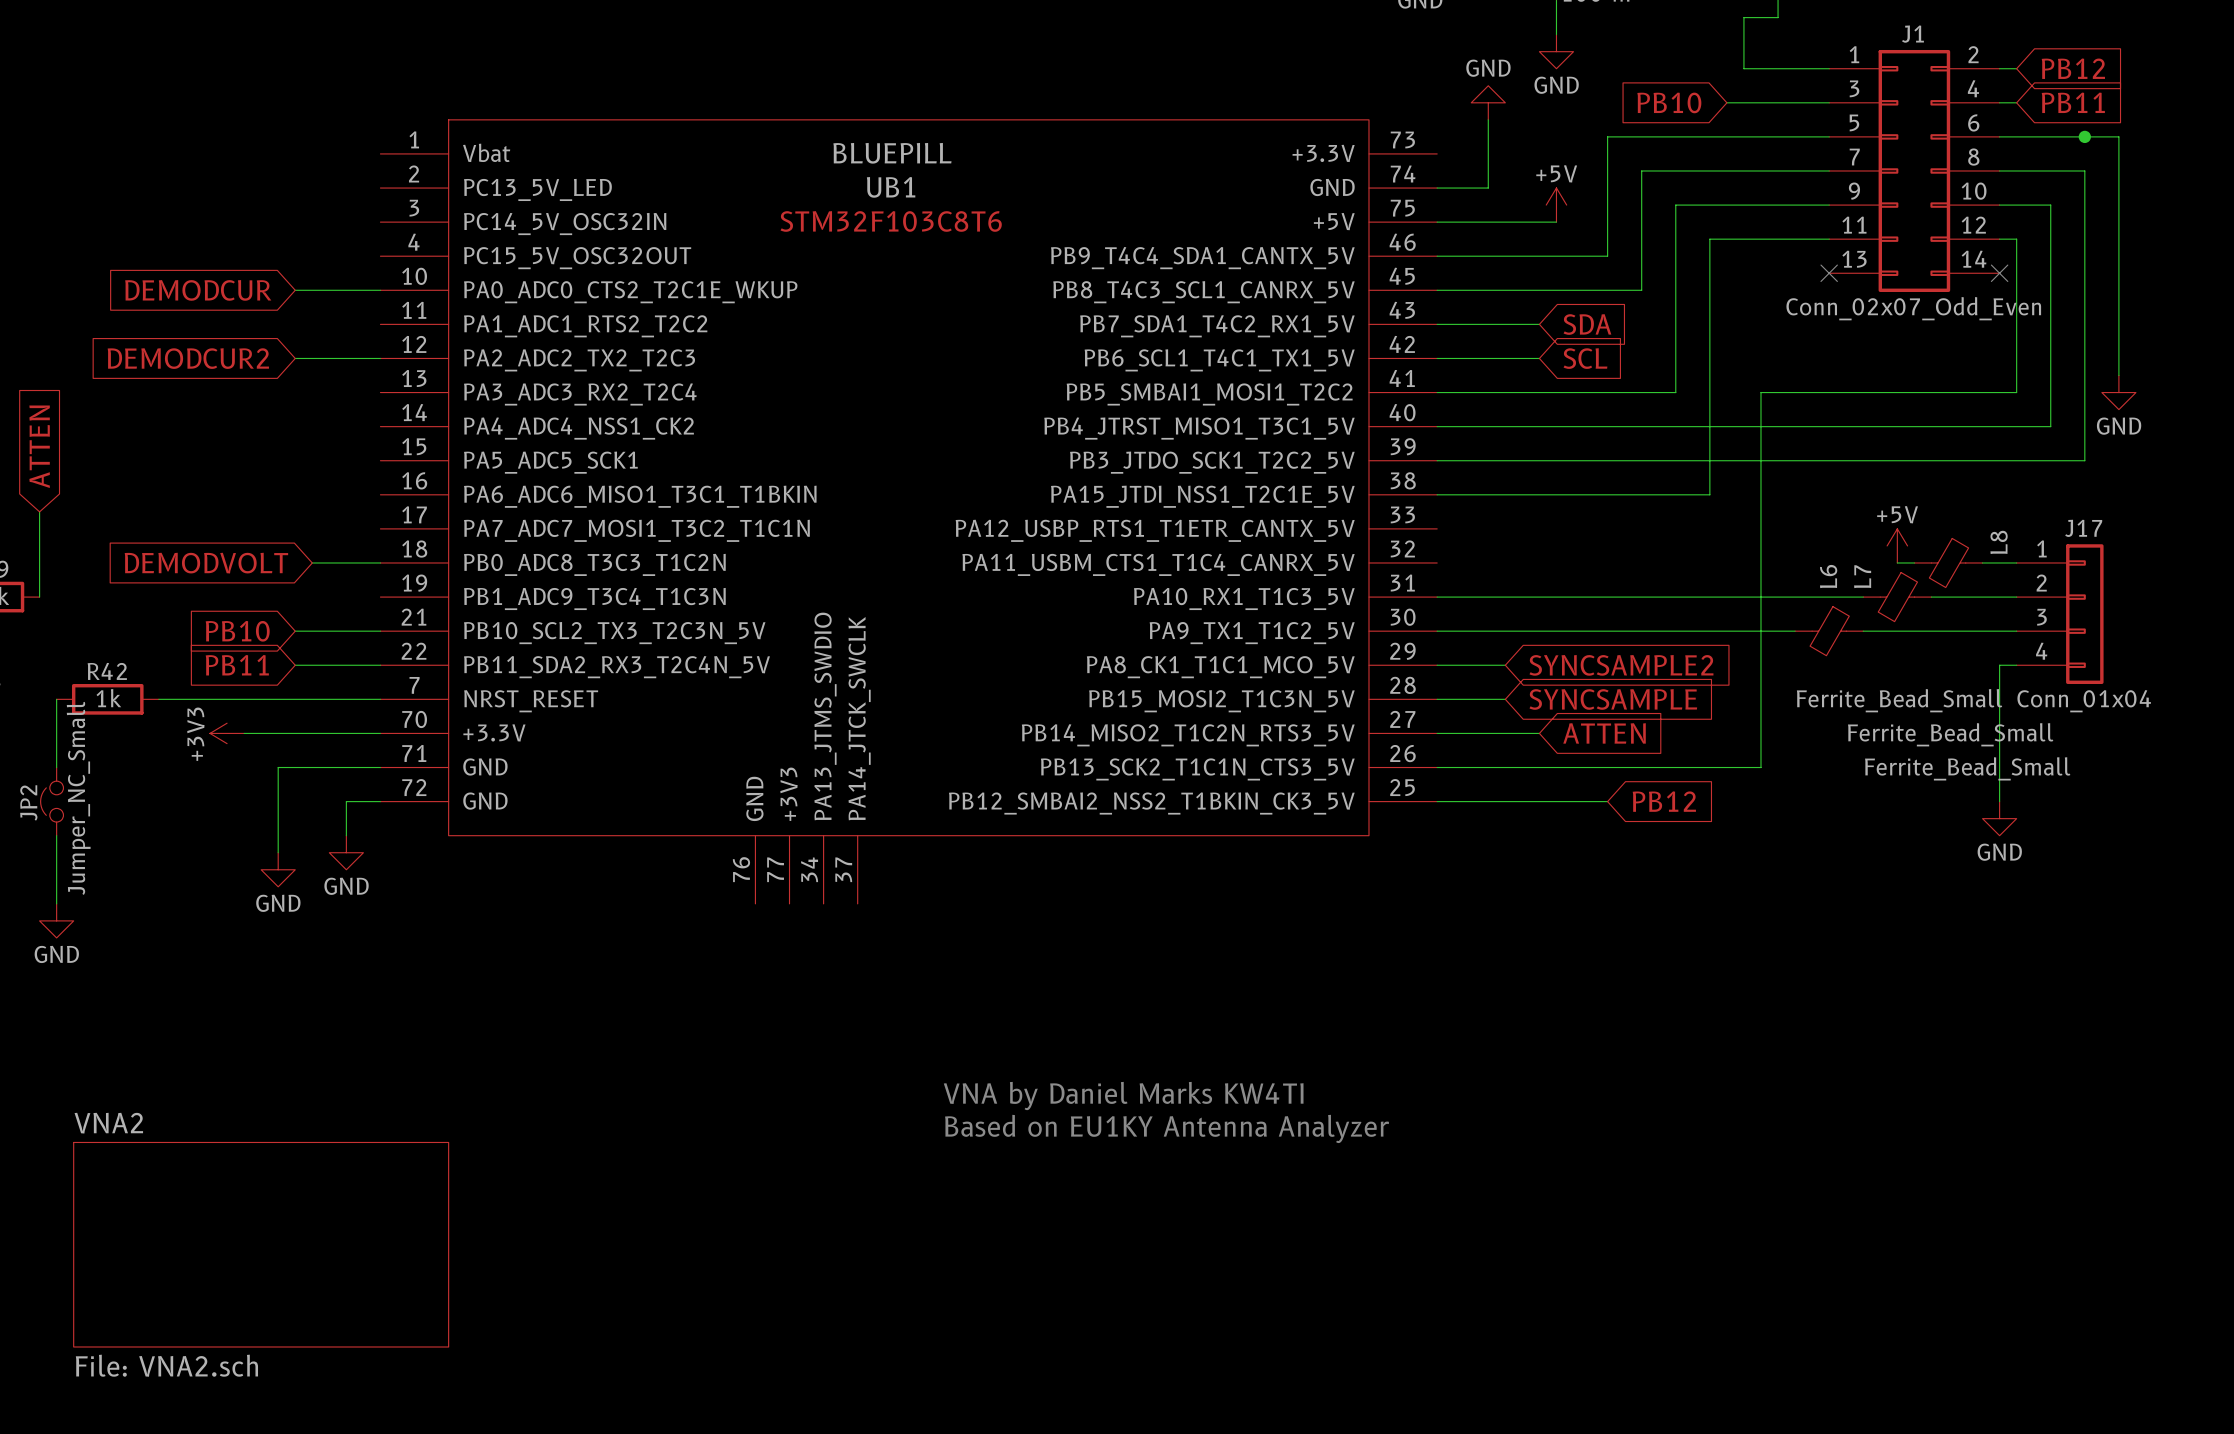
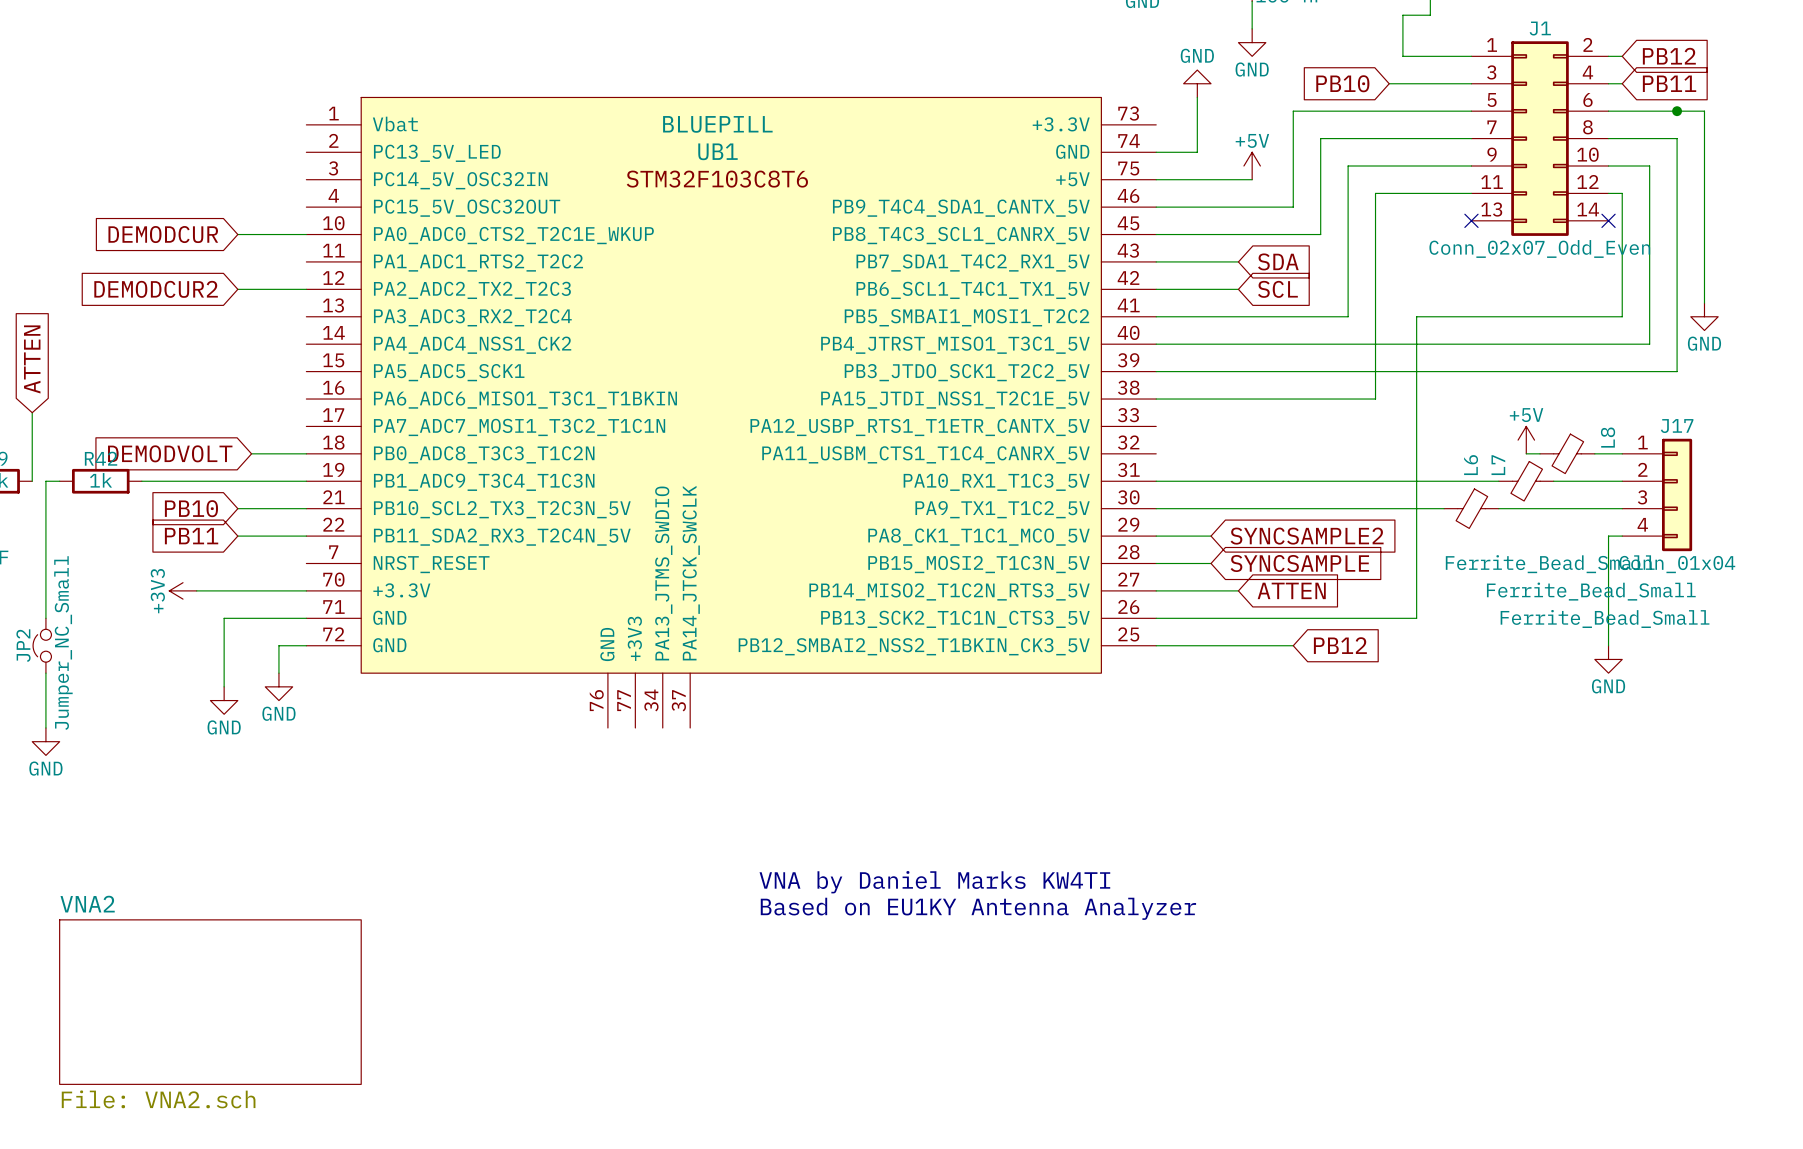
wire: none -> (59, 481) (45, 481) (45, 563)
wire: none -> (141, 481) (306, 481)
R42 position: (107, 699) -> (100, 481)
wire: (158, 699) (380, 699) -> none

